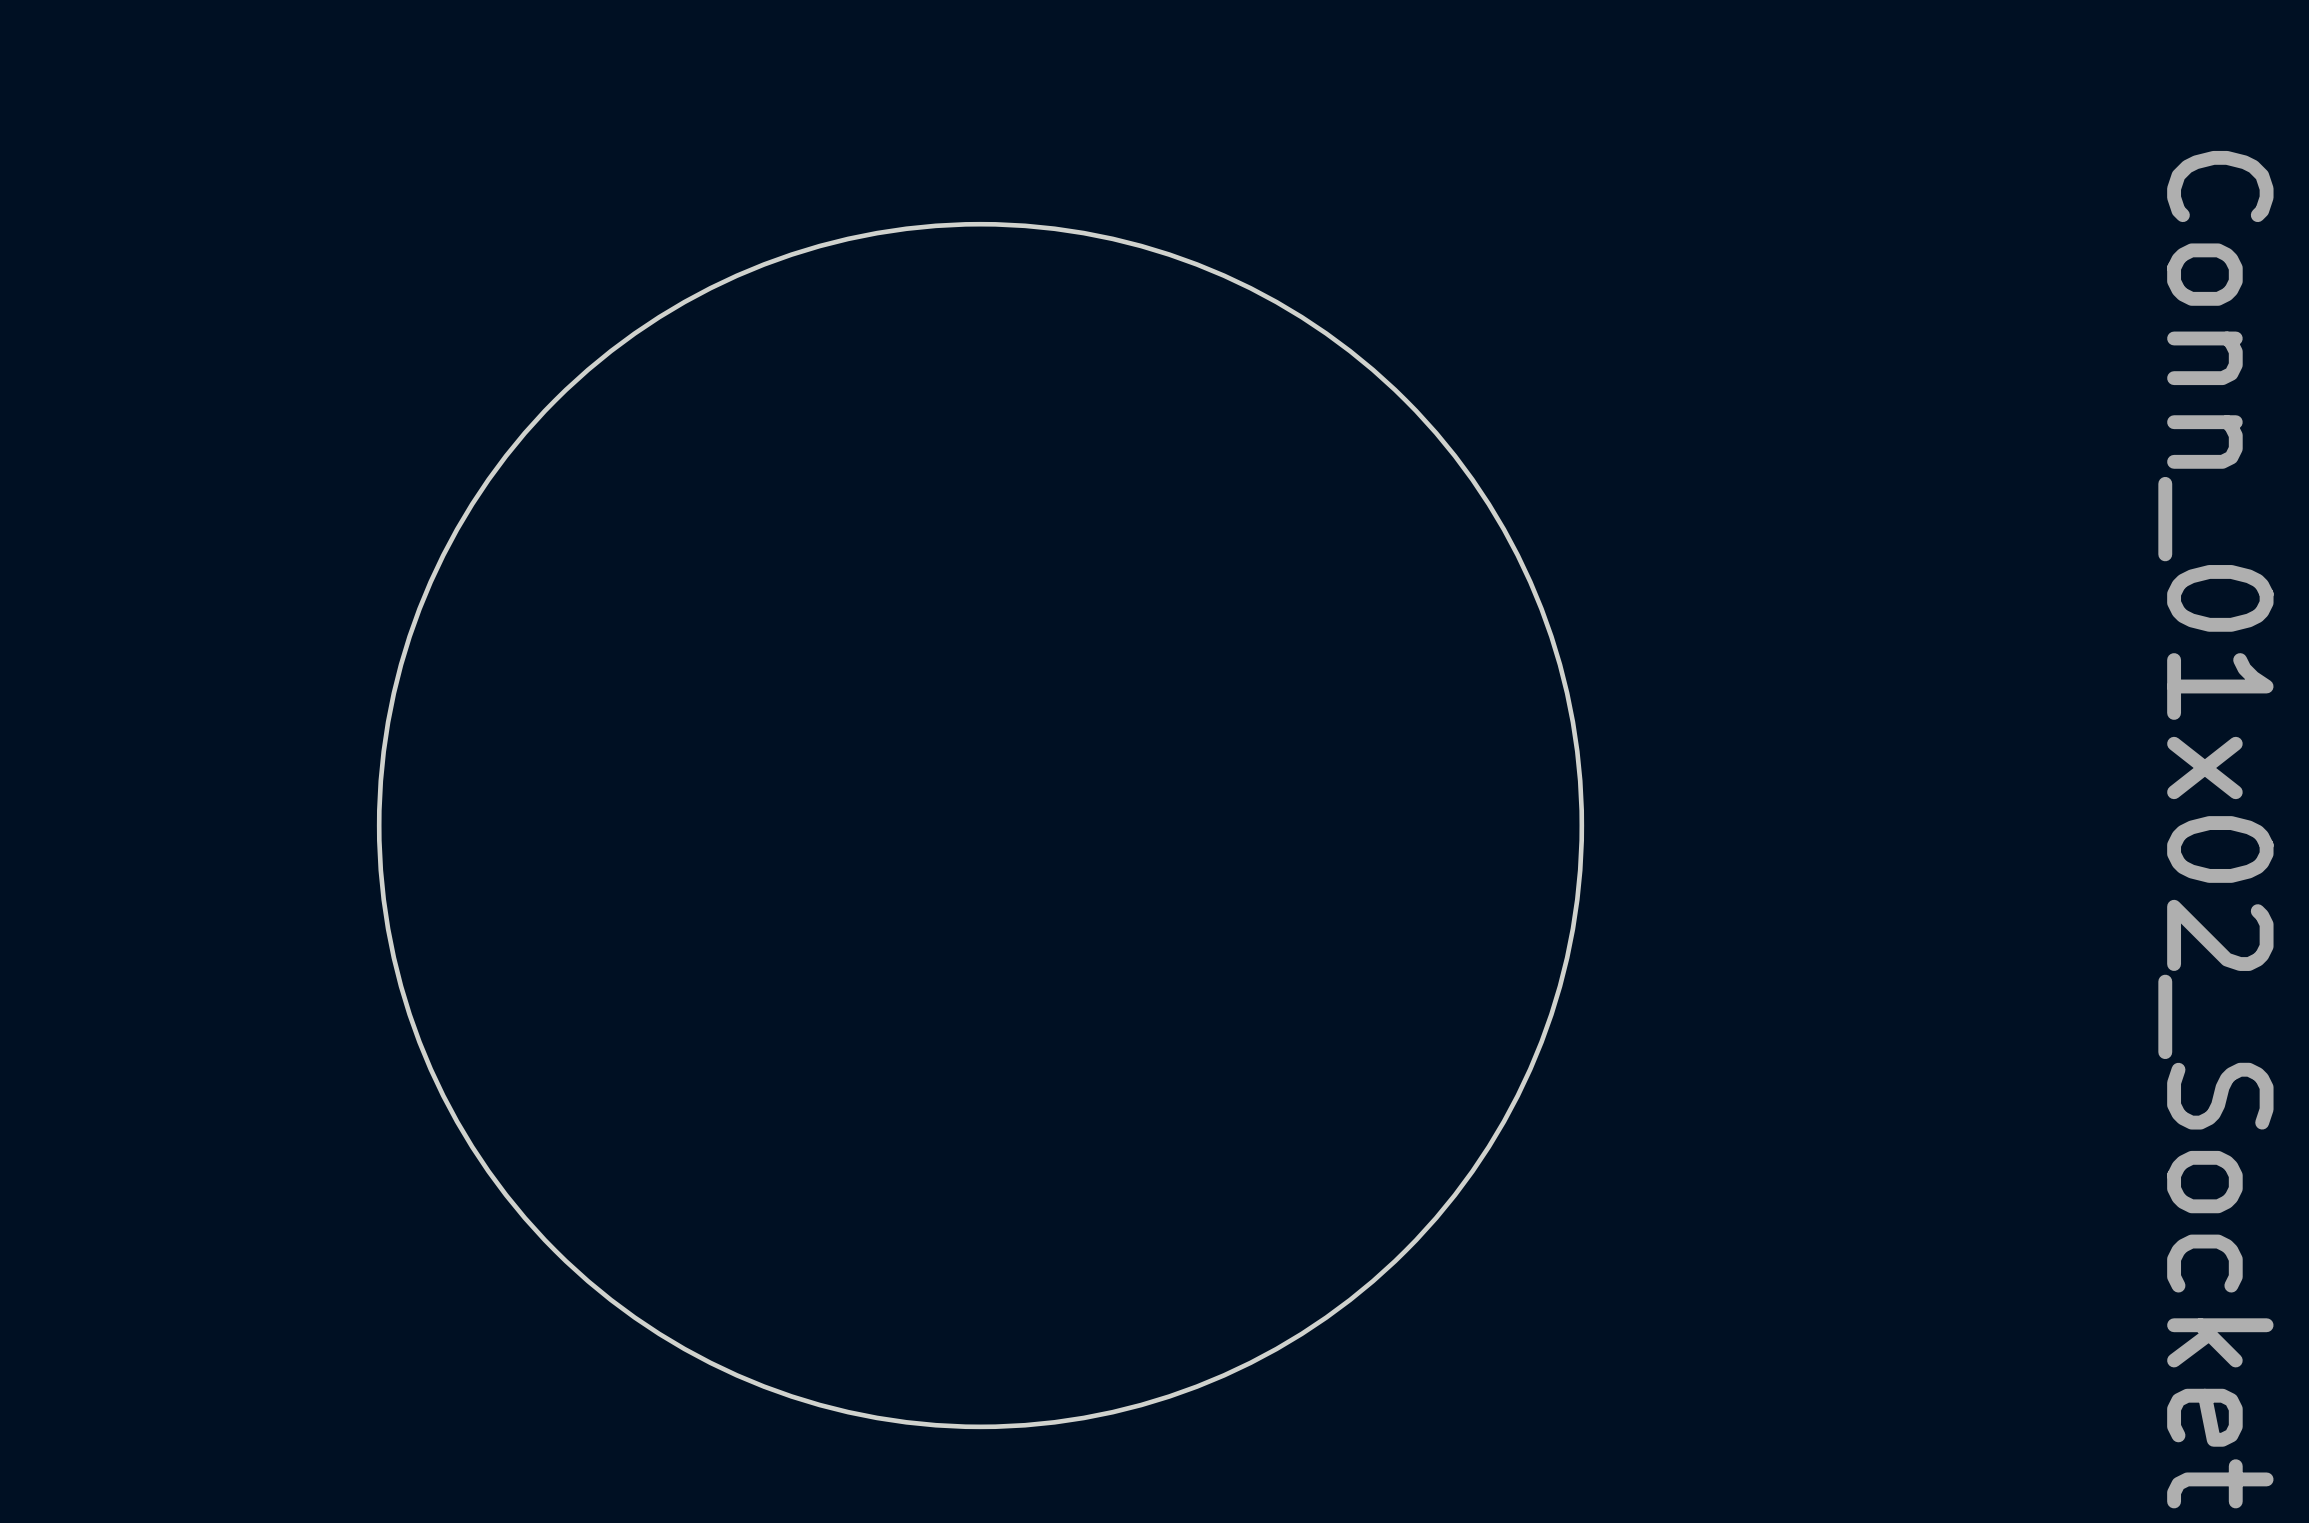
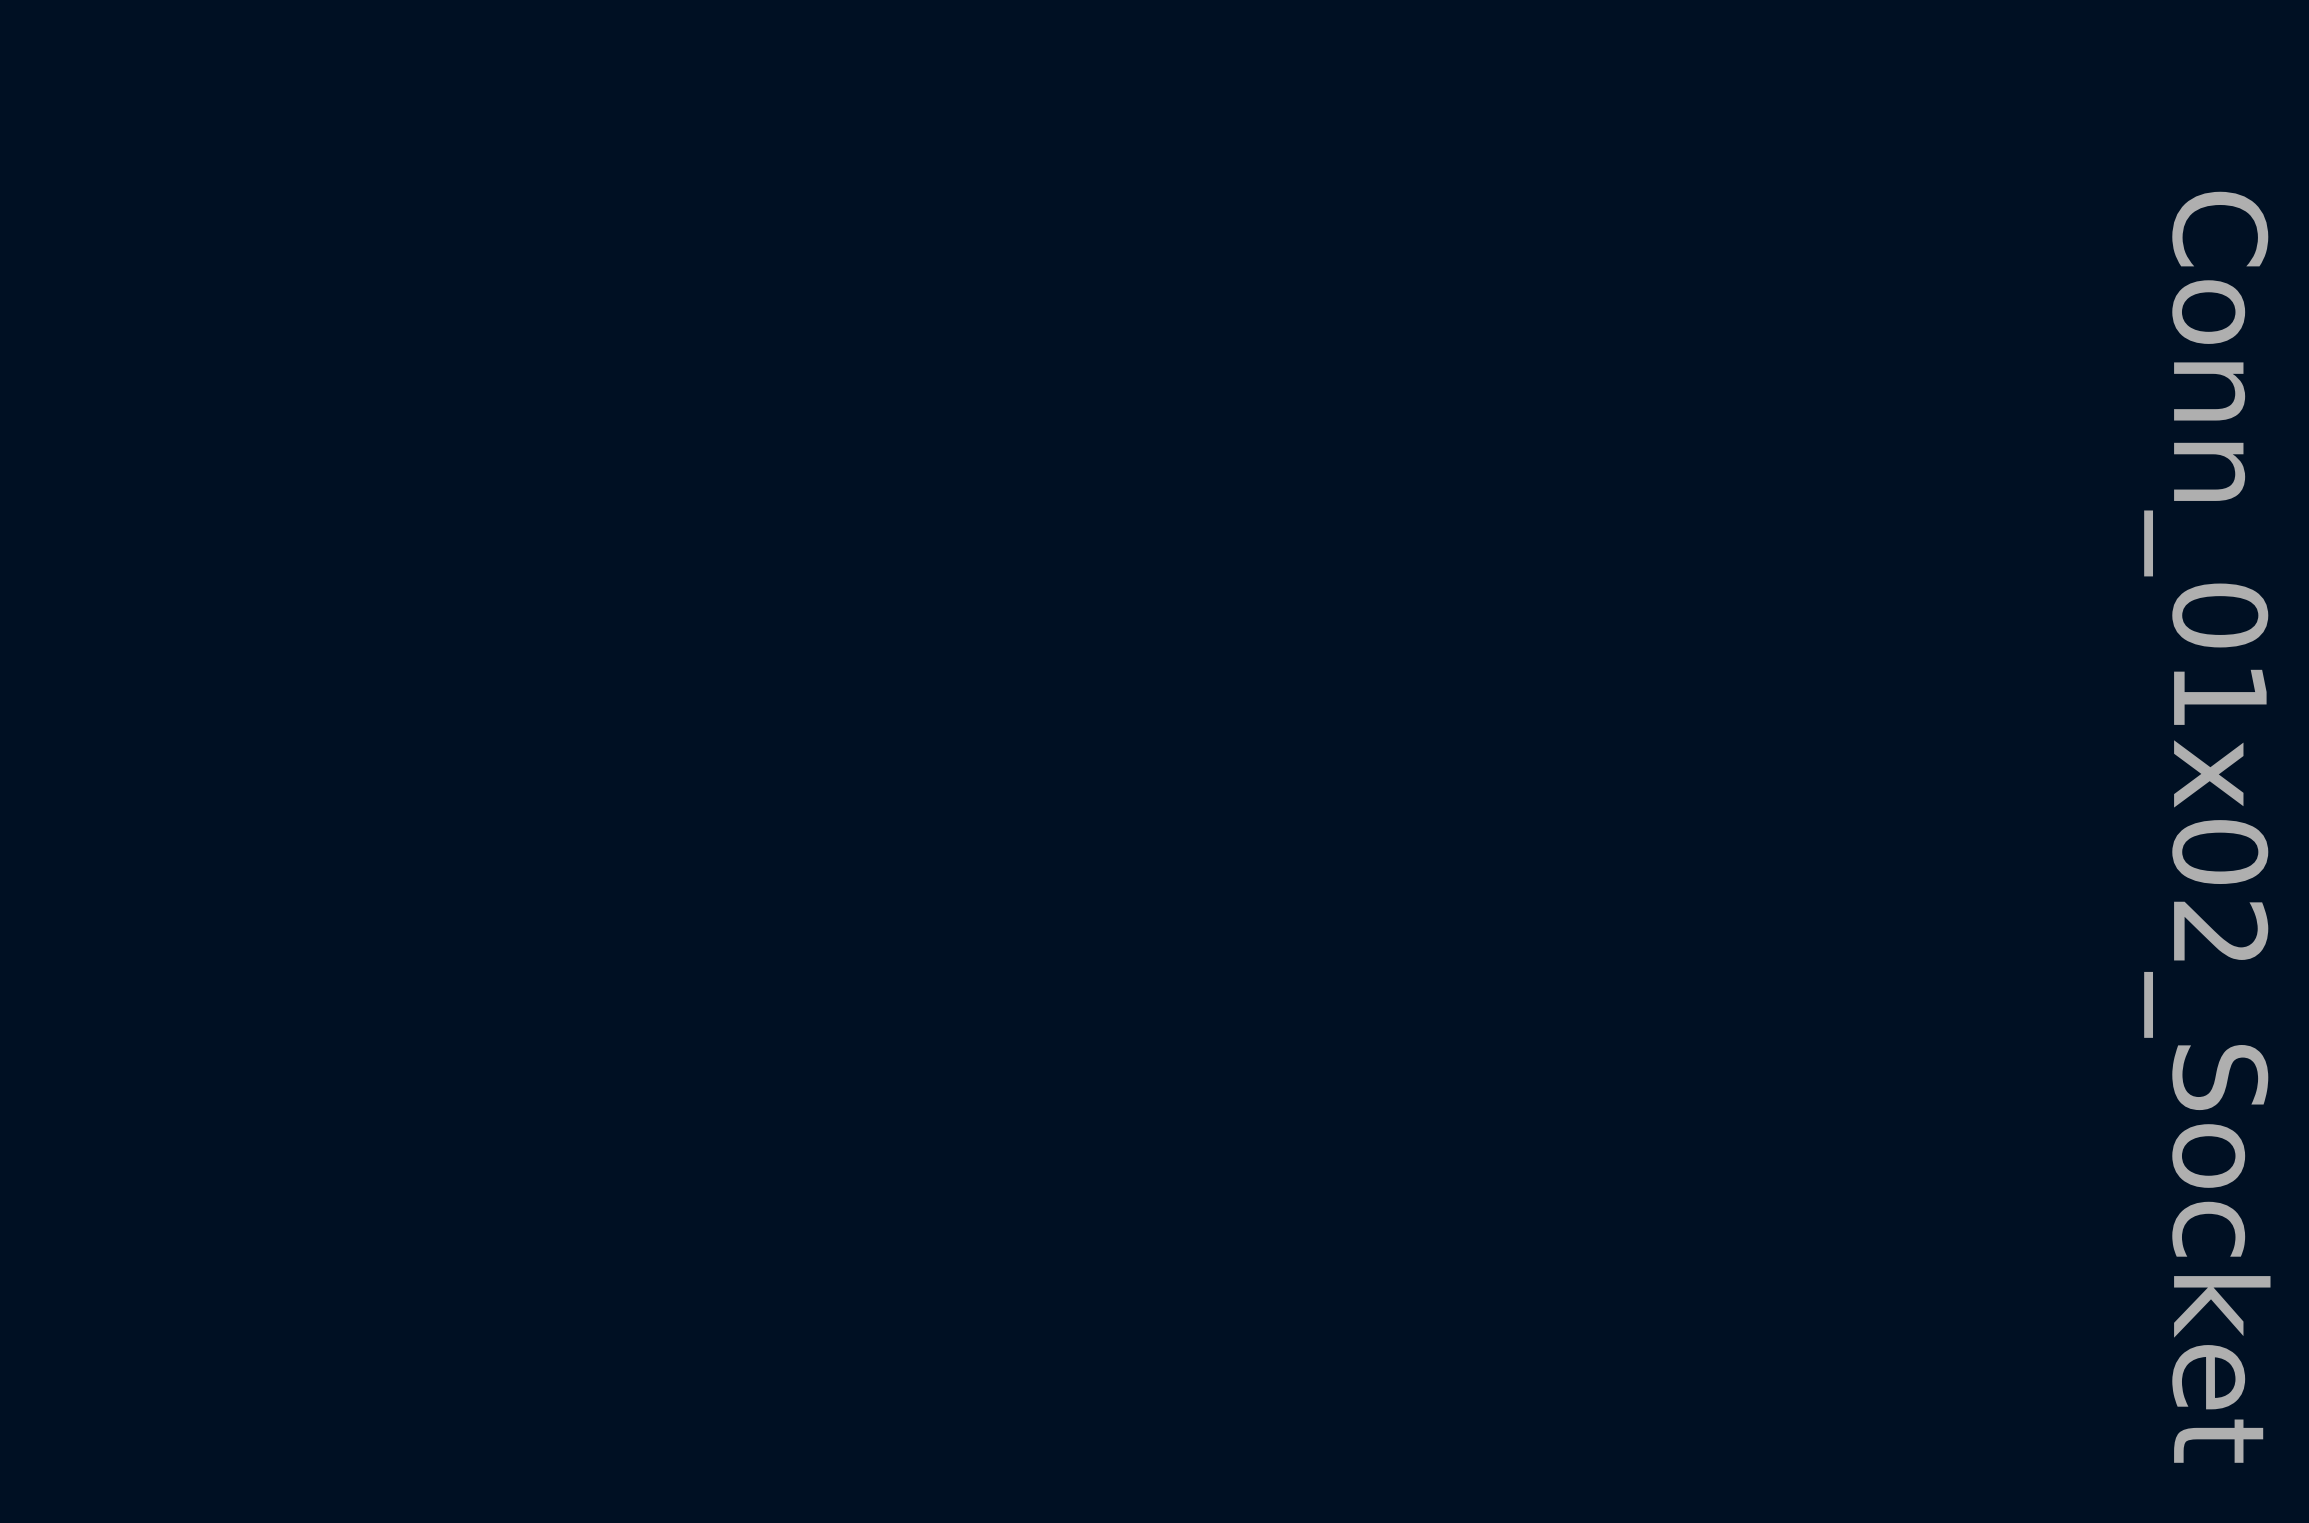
drawing: [376, 221, 1585, 1430] -> none

